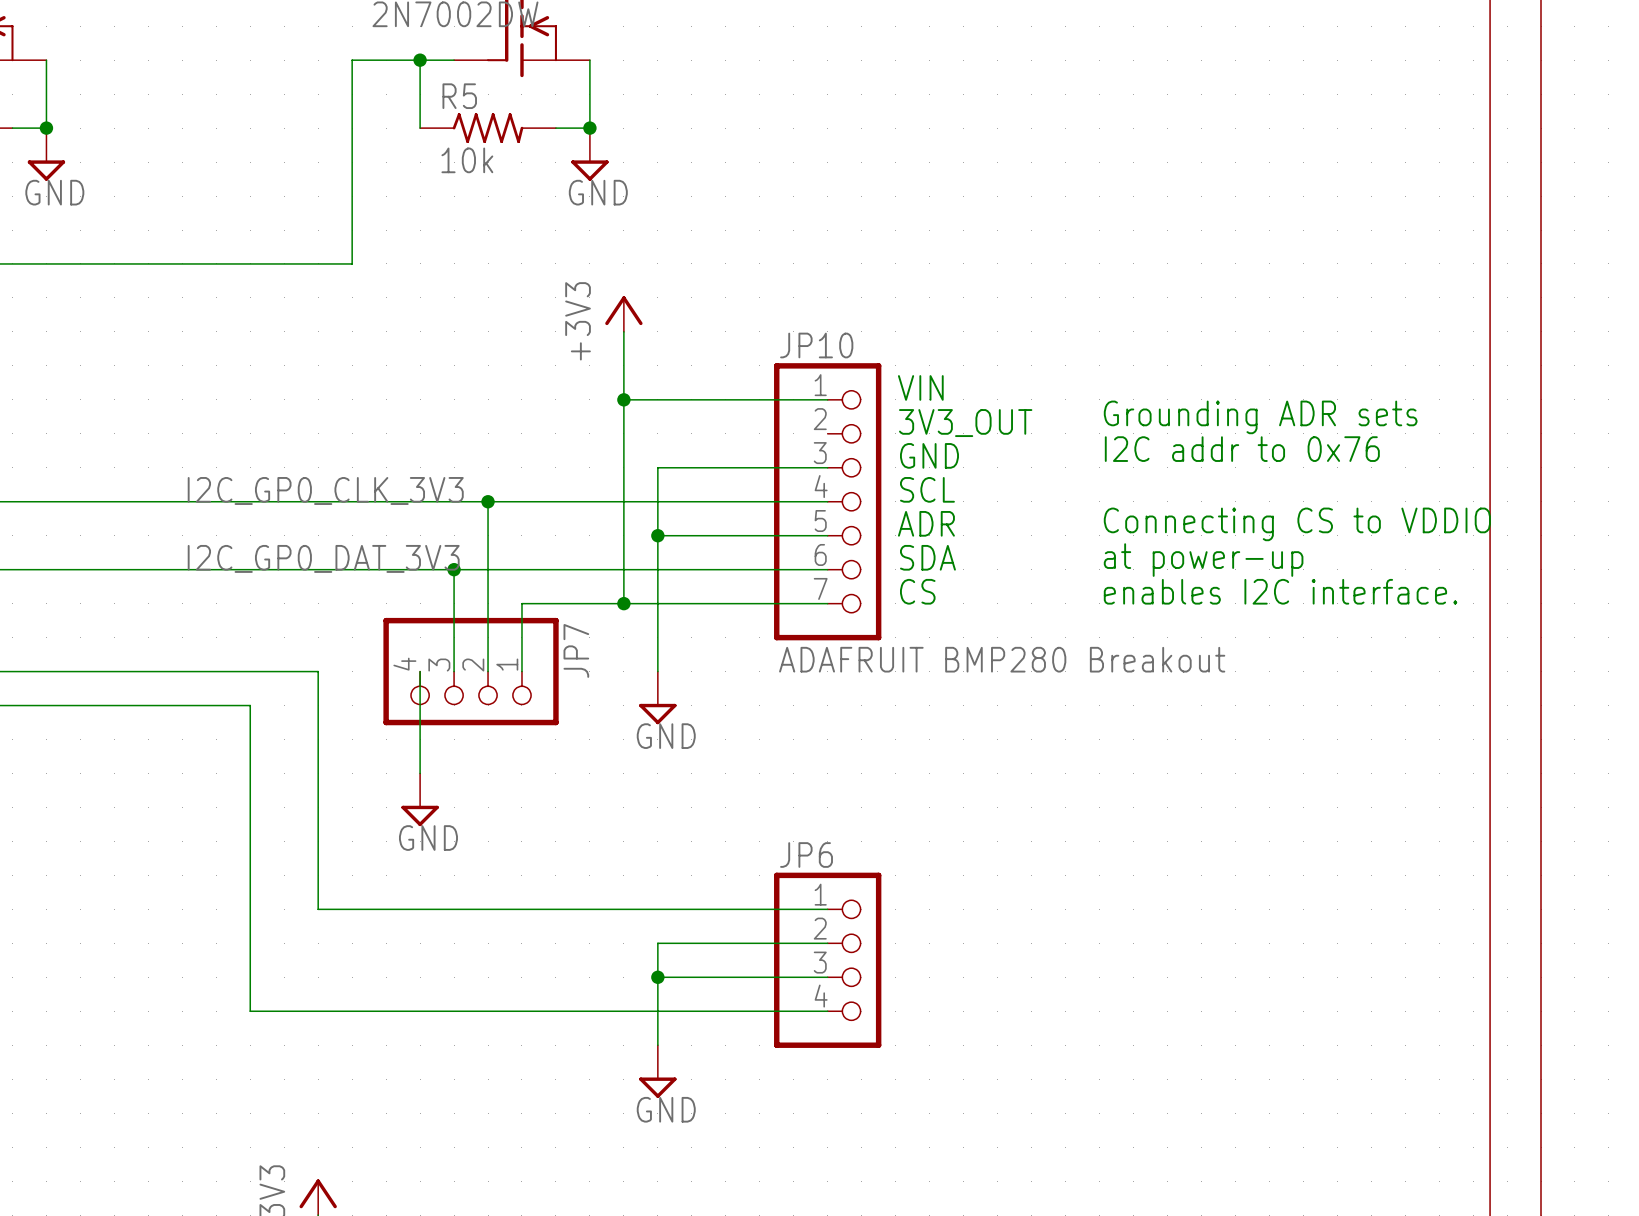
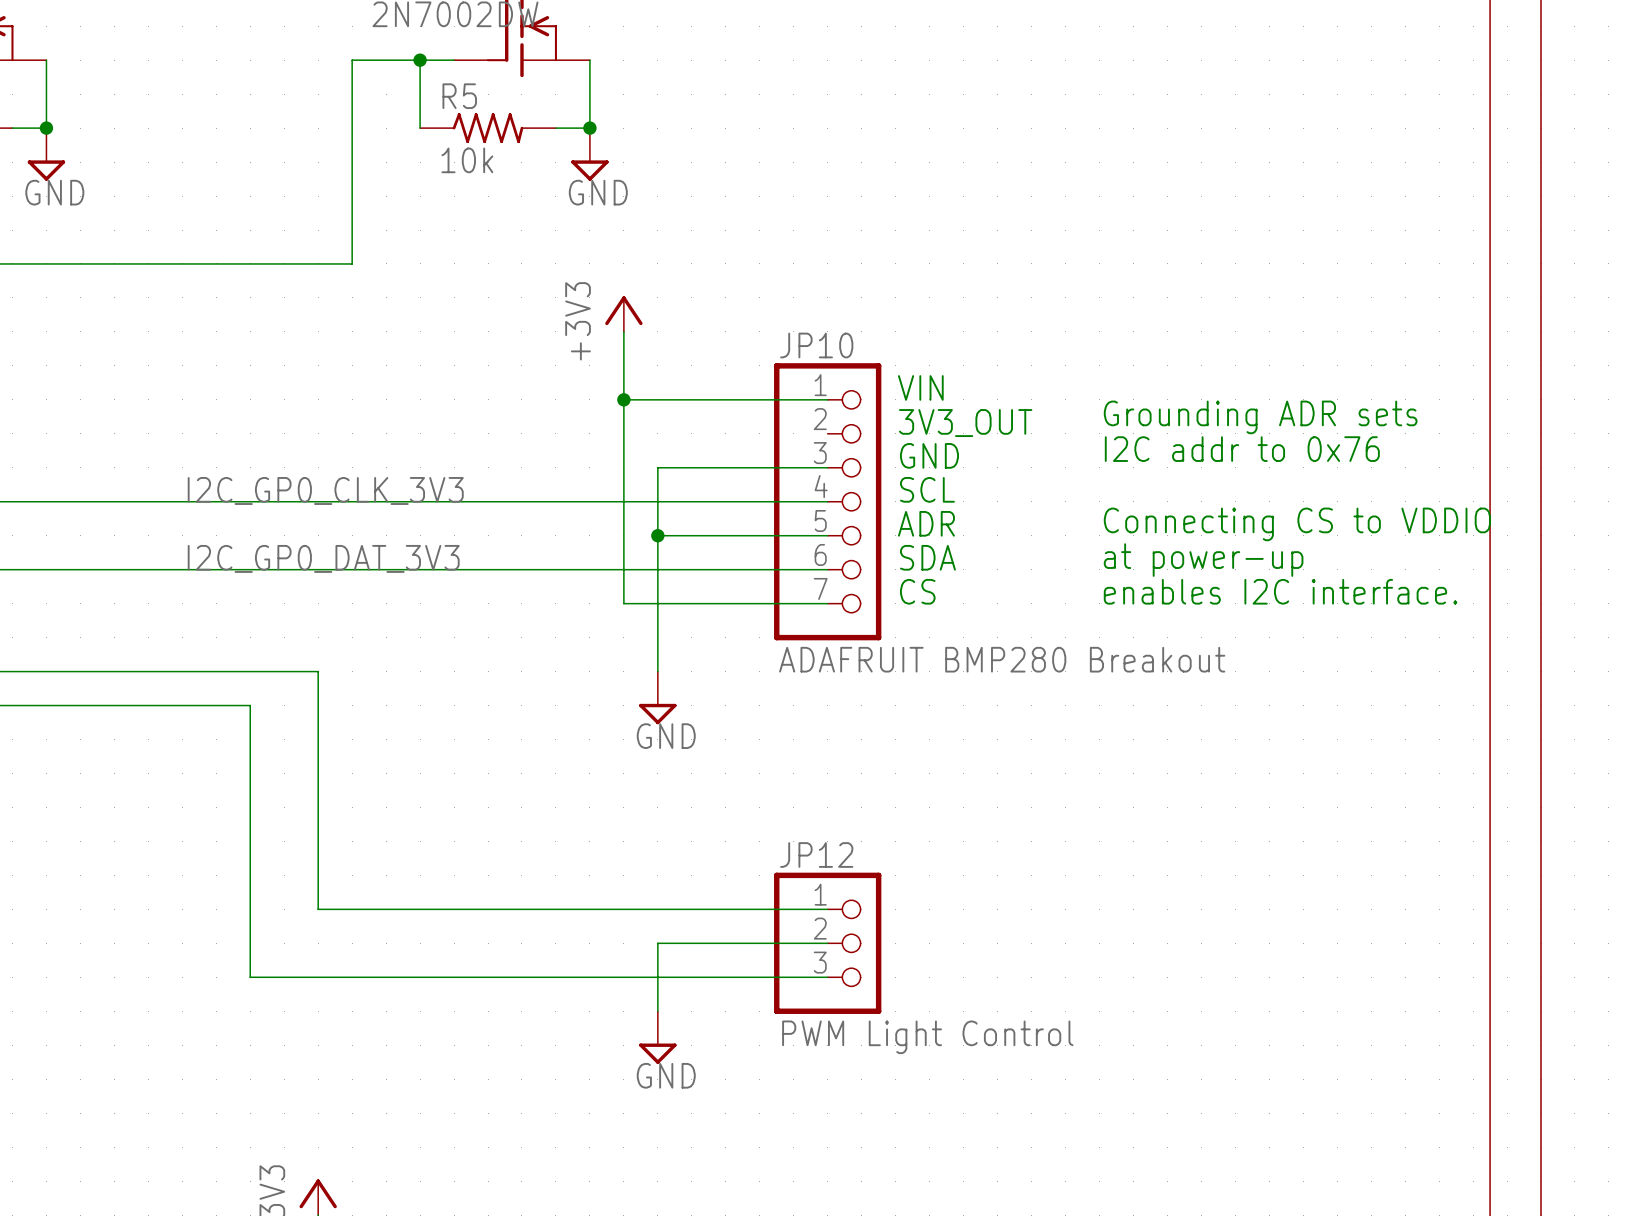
wire: (488, 501) (488, 671) -> none
junction: (488, 501) -> none
wire: (454, 569) (454, 671) -> none
junction: (454, 569) -> none
wire: (623, 603) (521, 603) (521, 671) -> none
junction: (623, 603) -> none
wire: (420, 671) (420, 773) -> none
JP7: (471, 671) -> none
power symbol: GND (420, 799) -> none
JP12: none -> PWM Light Control (827, 943)
JP6: (827, 960) -> none
wire: (250, 977) (250, 1011) (827, 1011) -> (250, 977) (657, 977)
junction: (657, 977) -> none
power symbol position: GND (657, 1071) -> GND (657, 1037)

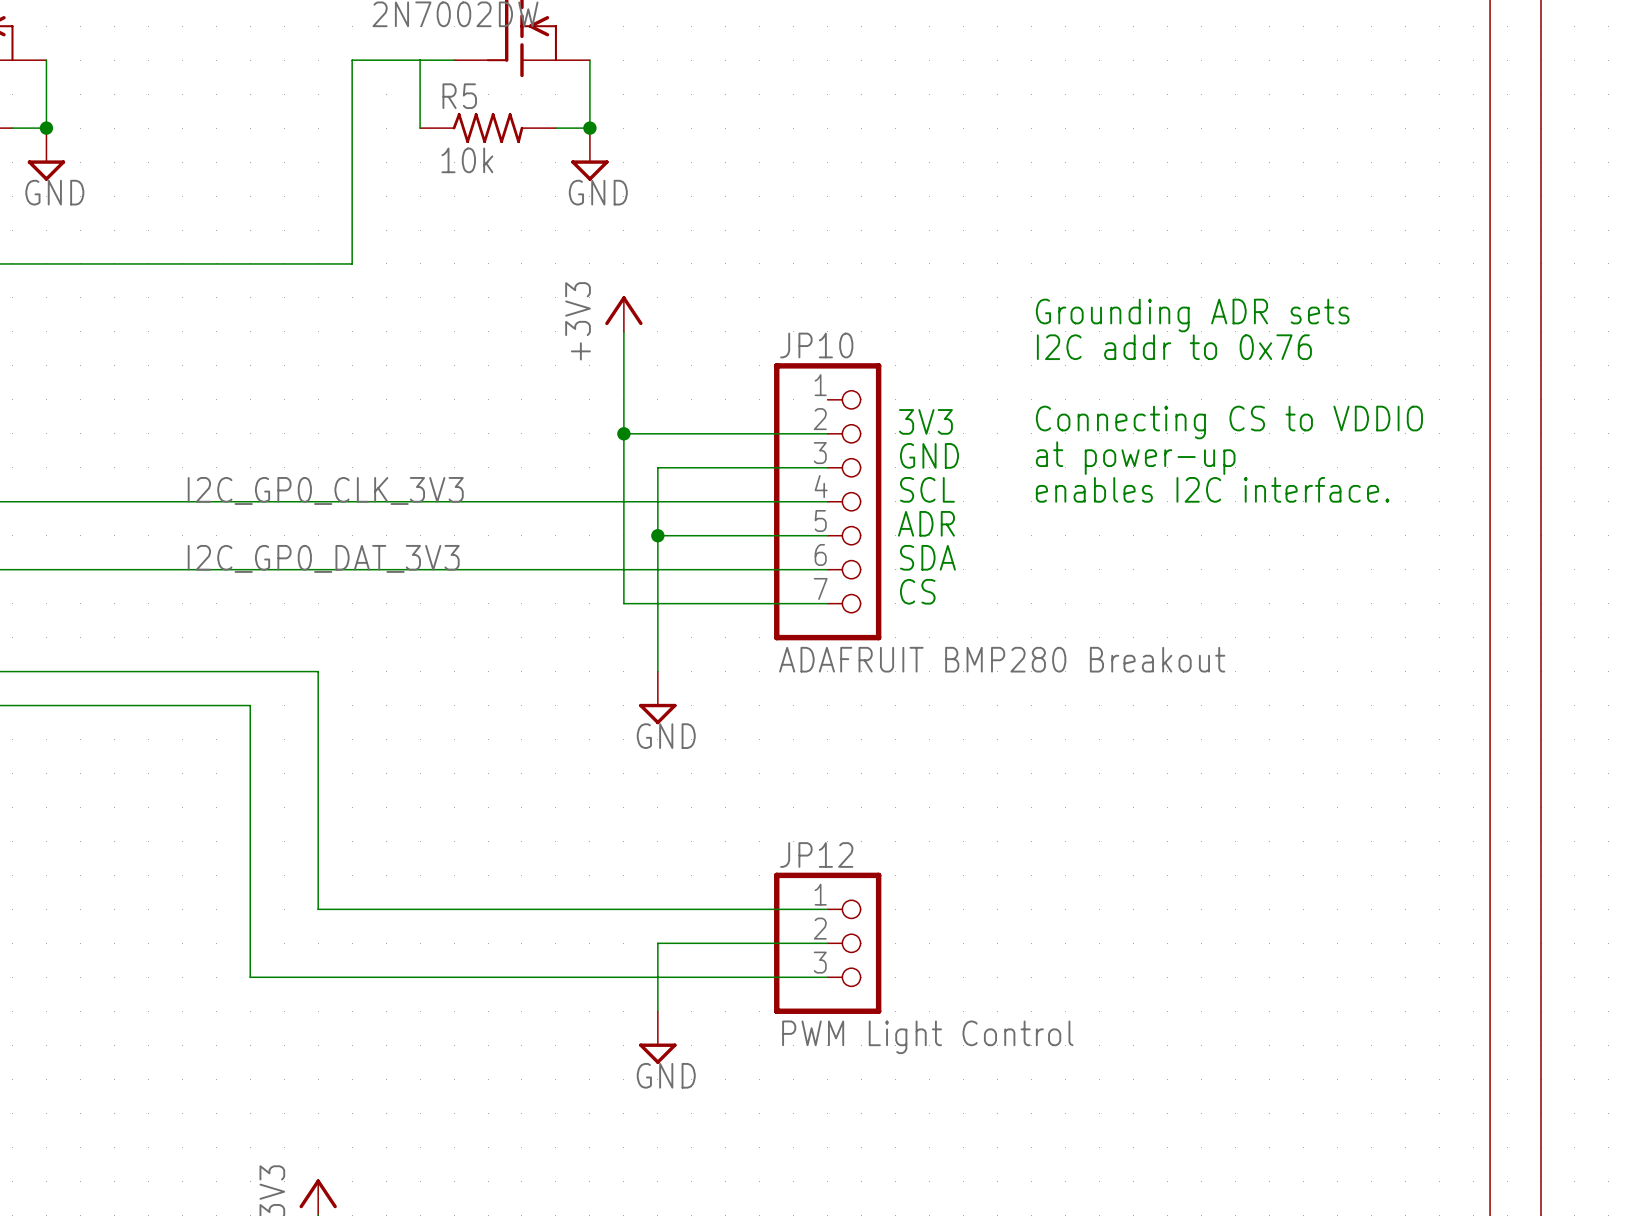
junction: (420, 60) -> none
text: VIN (920, 387) -> none
wire: (623, 399) (827, 399) -> (623, 433) (827, 433)
junction position: (623, 399) -> (623, 433)
text position: Grounding ADR sets (1260, 417) -> Grounding ADR sets (1192, 315)
text: 3V3_OUT (965, 423) -> 3V3 (925, 421)
text position: I2C addr to 0x76 (1242, 449) -> I2C addr to 0x76 (1174, 347)
text position: Connecting CS to VDDIO (1297, 524) -> Connecting CS to VDDIO (1229, 422)
text position: at power-up (1203, 560) -> at power-up (1135, 458)
text position: enables I2C interface. (1280, 591) -> enables I2C interface. (1212, 489)

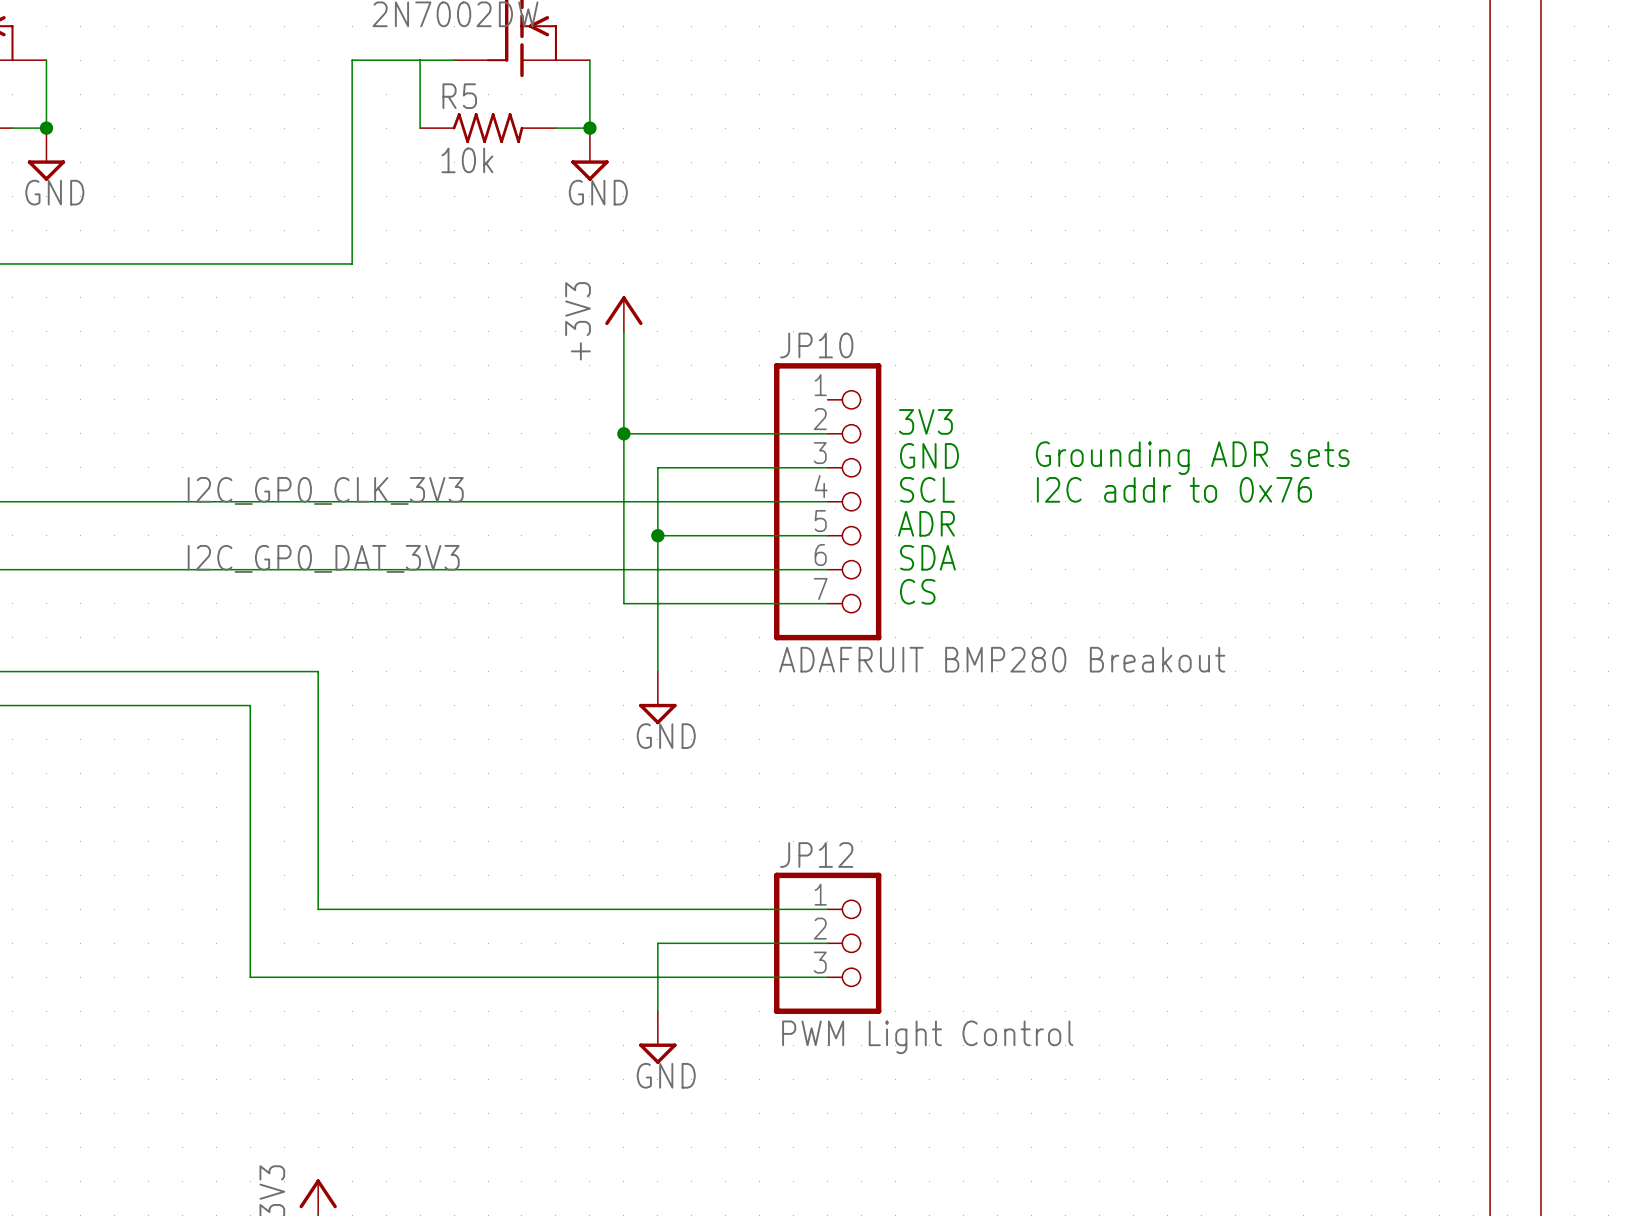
text: Grounding ADR sets (1192, 315) -> none
text: I2C addr to 0x76 (1174, 347) -> none
text: Connecting CS to VDDIO (1229, 422) -> none
text: at power-up (1135, 458) -> Grounding ADR sets (1192, 458)
text: enables I2C interface. (1212, 489) -> I2C addr to 0x76 (1174, 489)

